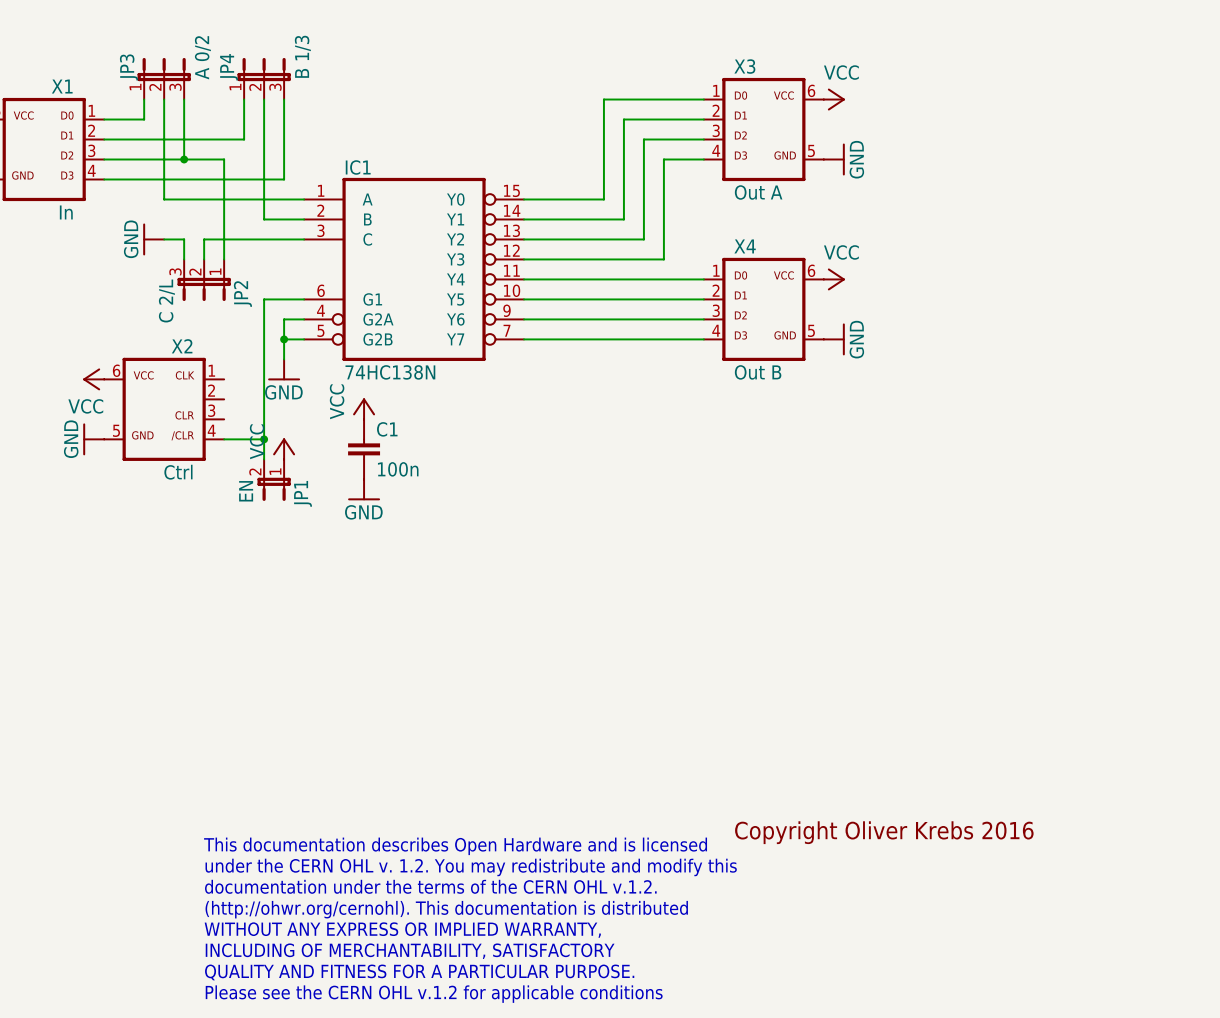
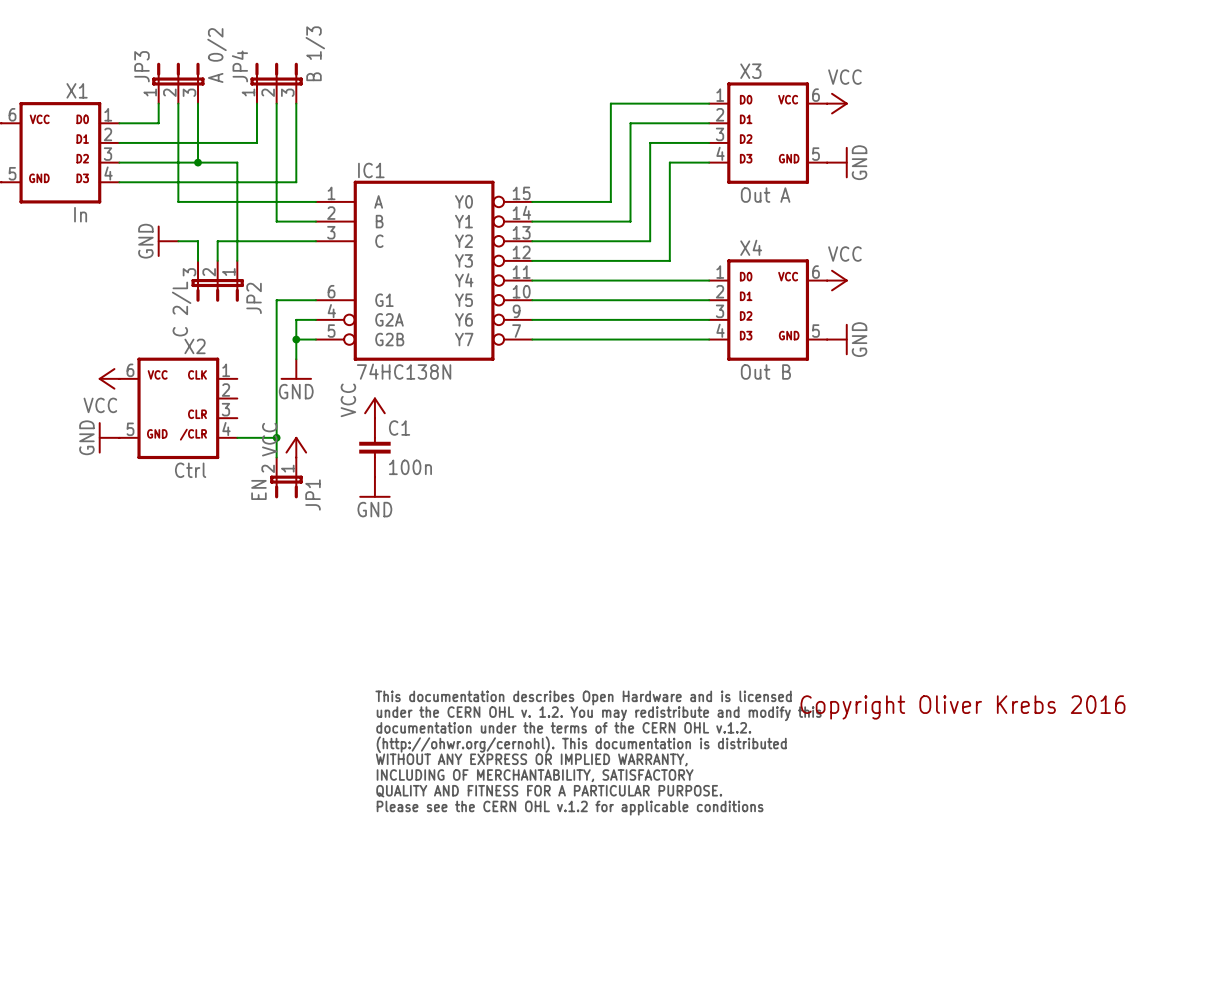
text: none -> This documentation describes Open Hardware and is licensed (583, 698)
text: none -> under the CERN OHL v. 1.2. You may redistribute and modify this (599, 713)
text: none -> documentation under the terms of the CERN OHL v.1.2. (563, 727)
text: none -> (http://ohwr.org/cernohl). This documentation is distributed (581, 744)
text: none -> WITHOUT ANY EXPRESS OR IMPLIED WARRANTY, (531, 759)
text: none -> INCLUDING OF MERCHANTABILITY, SATISFACTORY (535, 775)
text: none -> QUALITY AND FITNESS FOR A PARTICULAR PURPOSE. (549, 791)
text: none -> Please see the CERN OHL v.1.2 for applicable conditions (570, 808)
text position: Copyright Oliver Krebs 2016 (884, 832) -> Copyright Oliver Krebs 2016 (962, 707)
text: This documentation describes Open Hardware and is licensed (455, 846) -> none
text: under the CERN OHL v. 1.2. You may redistribute and modify this (471, 867) -> none
text: documentation under the terms of the CERN OHL v.1.2. (430, 886) -> none
text: (http://ohwr.org/cernohl). This documentation is distributed (446, 909) -> none
text: WITHOUT ANY EXPRESS OR IMPLIED WARRANTY, (402, 930) -> none
text: INCLUDING OF MERCHANTABILITY, SATISFACTORY (410, 951) -> none
text: QUALITY AND FITNESS FOR A PARTICULAR PURPOSE. (419, 972) -> none
text: Please see the CERN OHL v.1.2 for applicable conditions (434, 994) -> none

